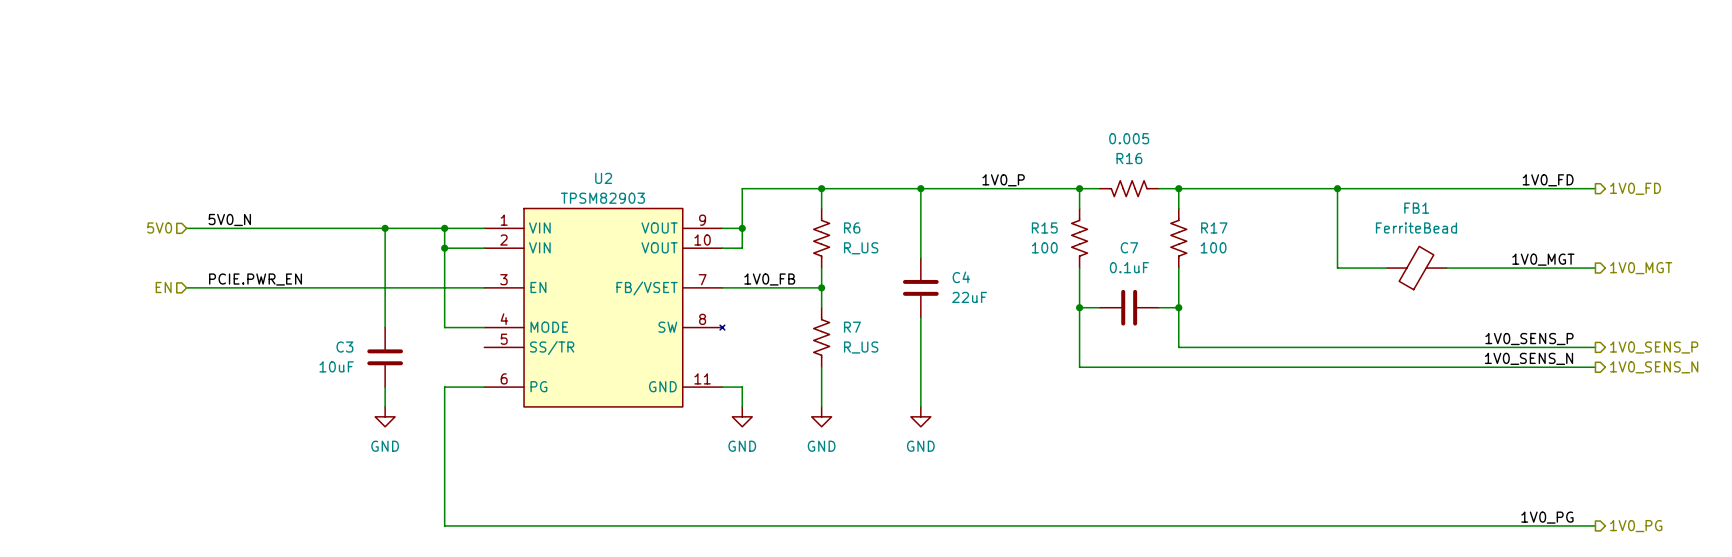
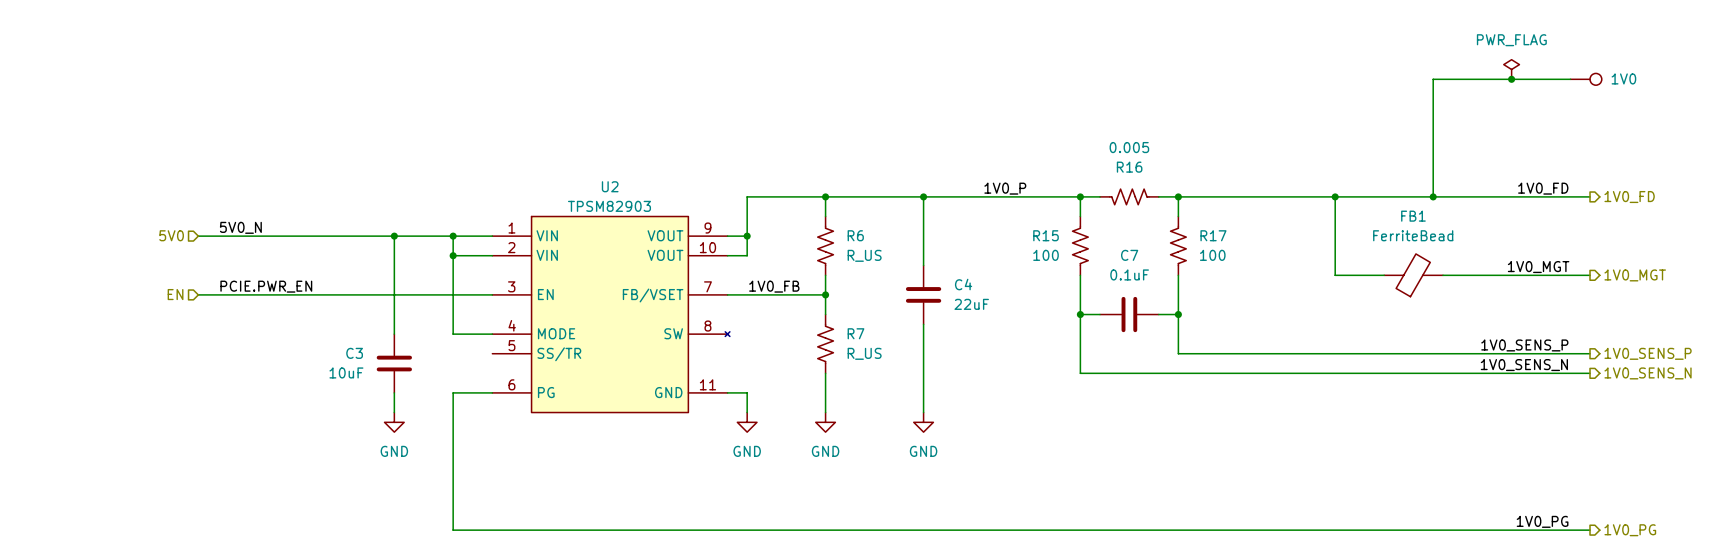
power symbol: none -> PWR_FLAG (1511, 69)
junction: none -> (1511, 79)
wire: none -> (1570, 79) (1433, 79) (1433, 196)
1V0: none -> (1586, 79)
junction: none -> (1433, 196)

